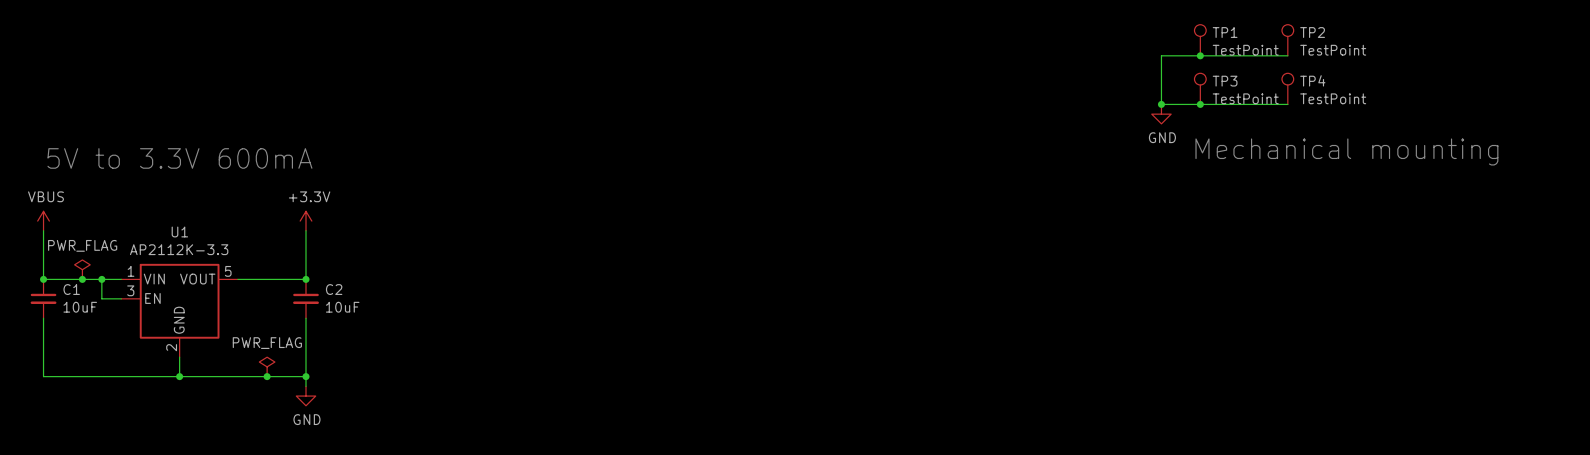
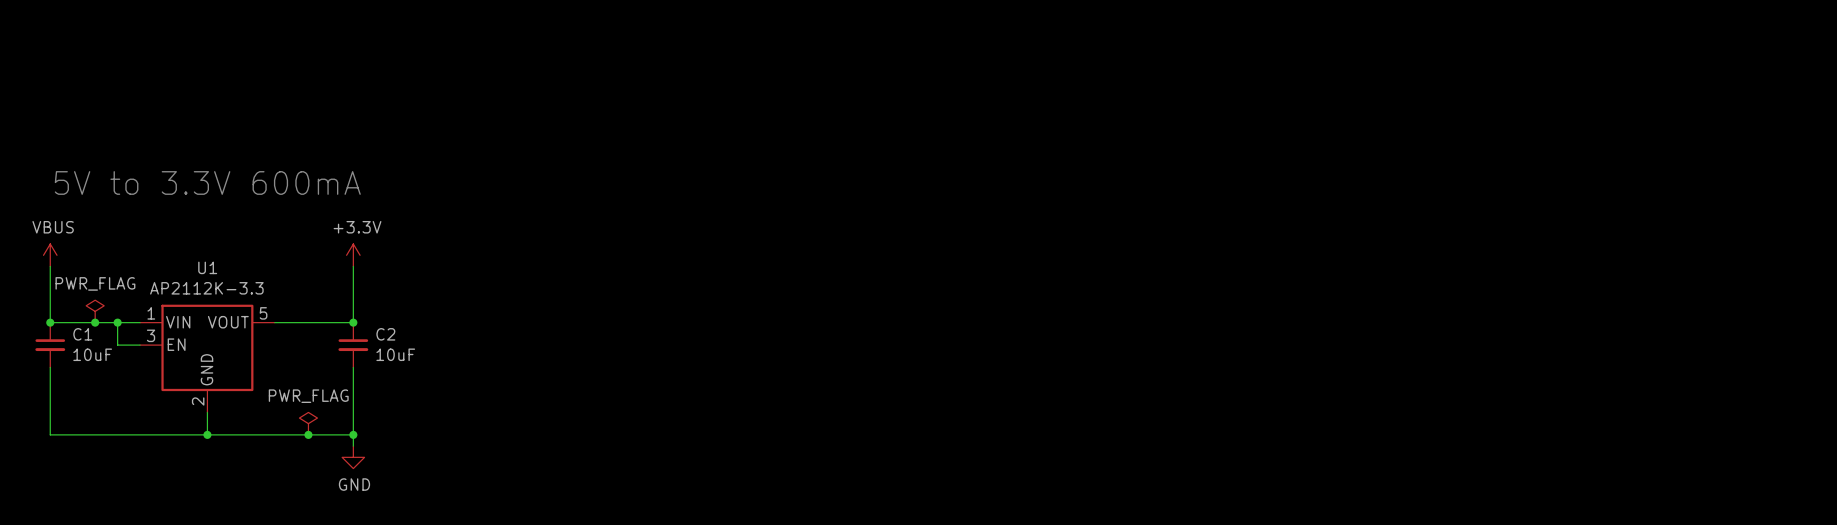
TP1: TestPoint (1200, 40) -> none
TP2: TestPoint (1287, 40) -> none
junction: (1200, 55) -> none
wire: (1287, 55) (1161, 55) (1161, 104) (1287, 104) -> none
TP3: TestPoint (1200, 88) -> none
TP4: TestPoint (1287, 88) -> none
junction: (1161, 104) -> none
junction: (1200, 104) -> none
power symbol: GND (1161, 114) -> none
text: Mechanical mounting (1346, 151) -> none

